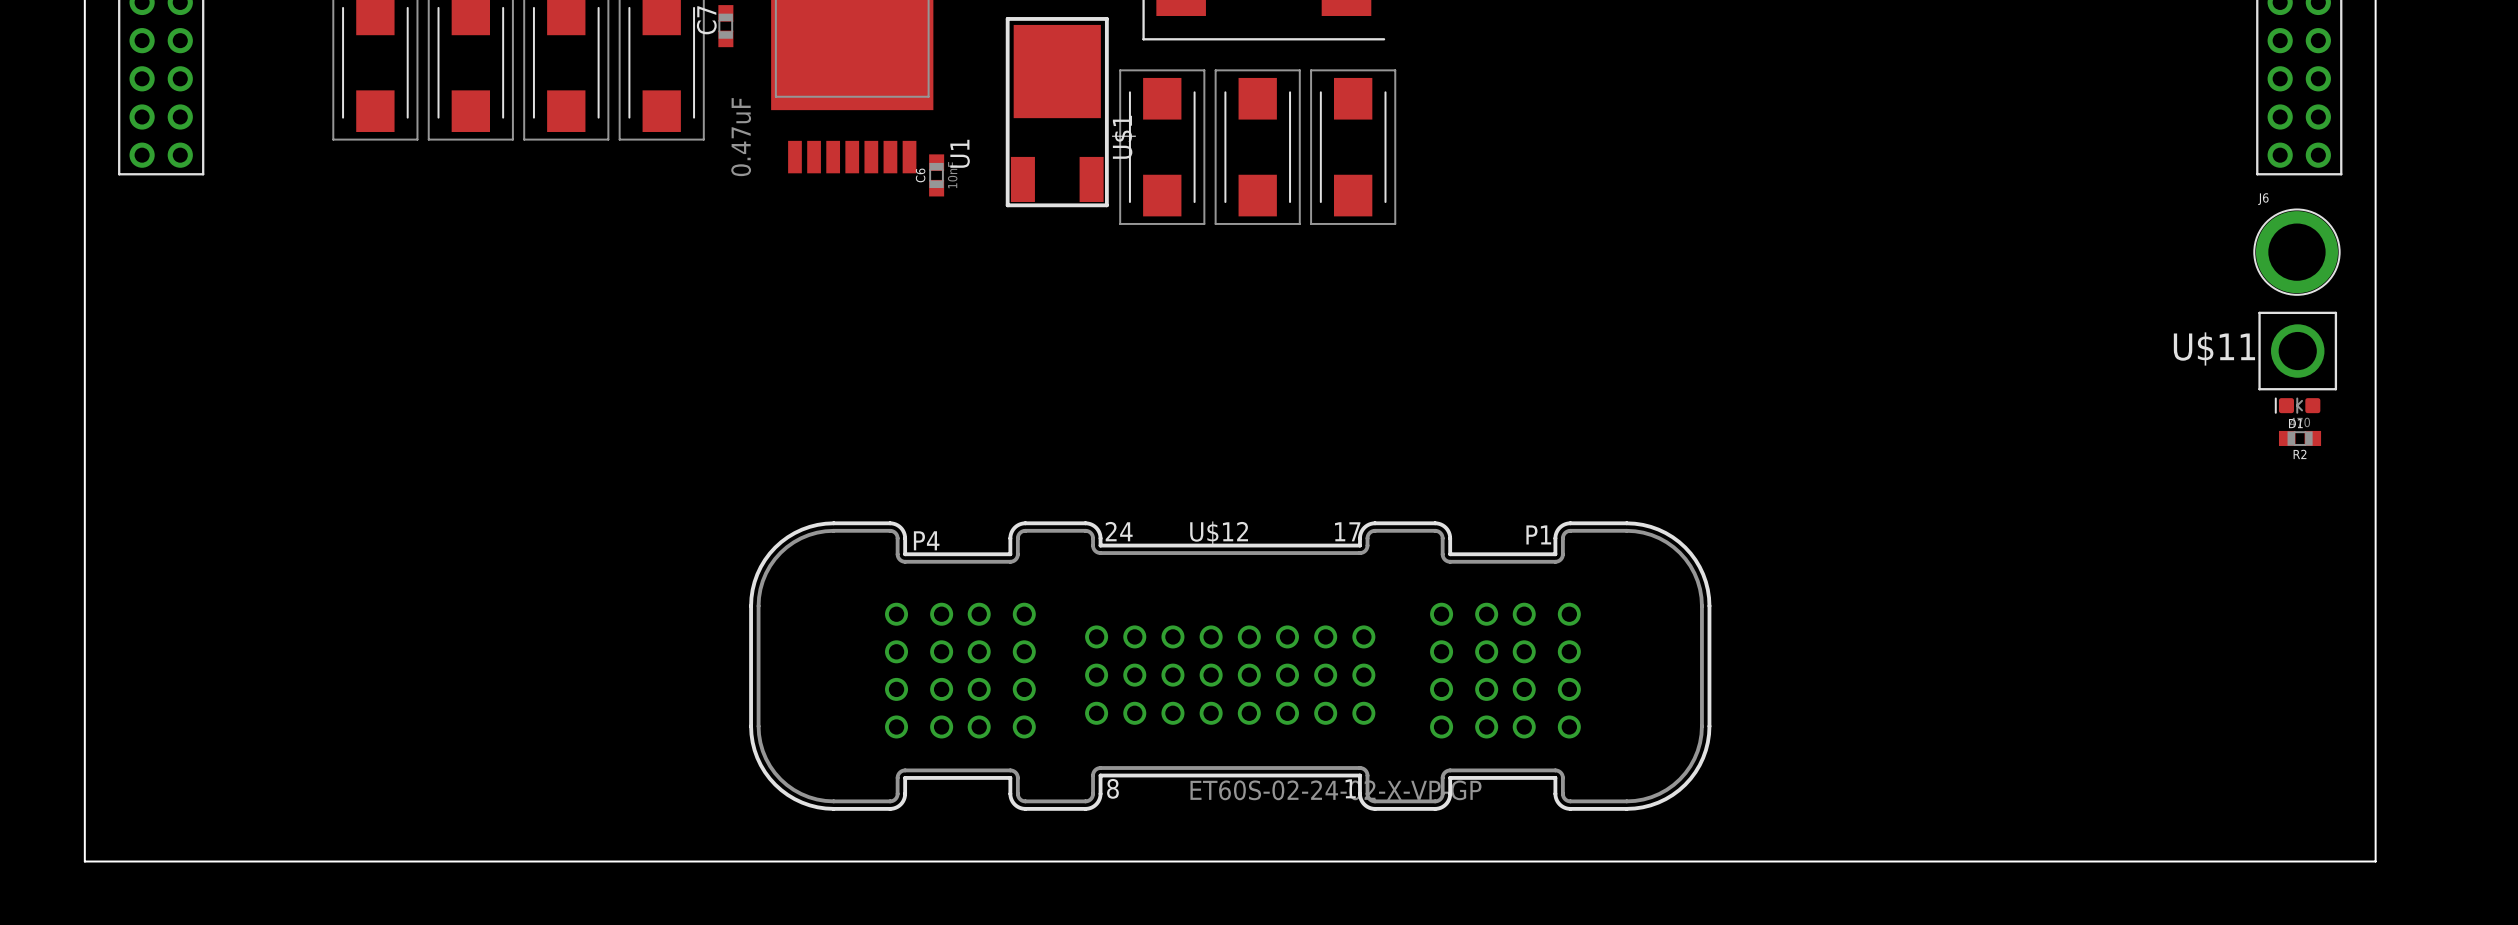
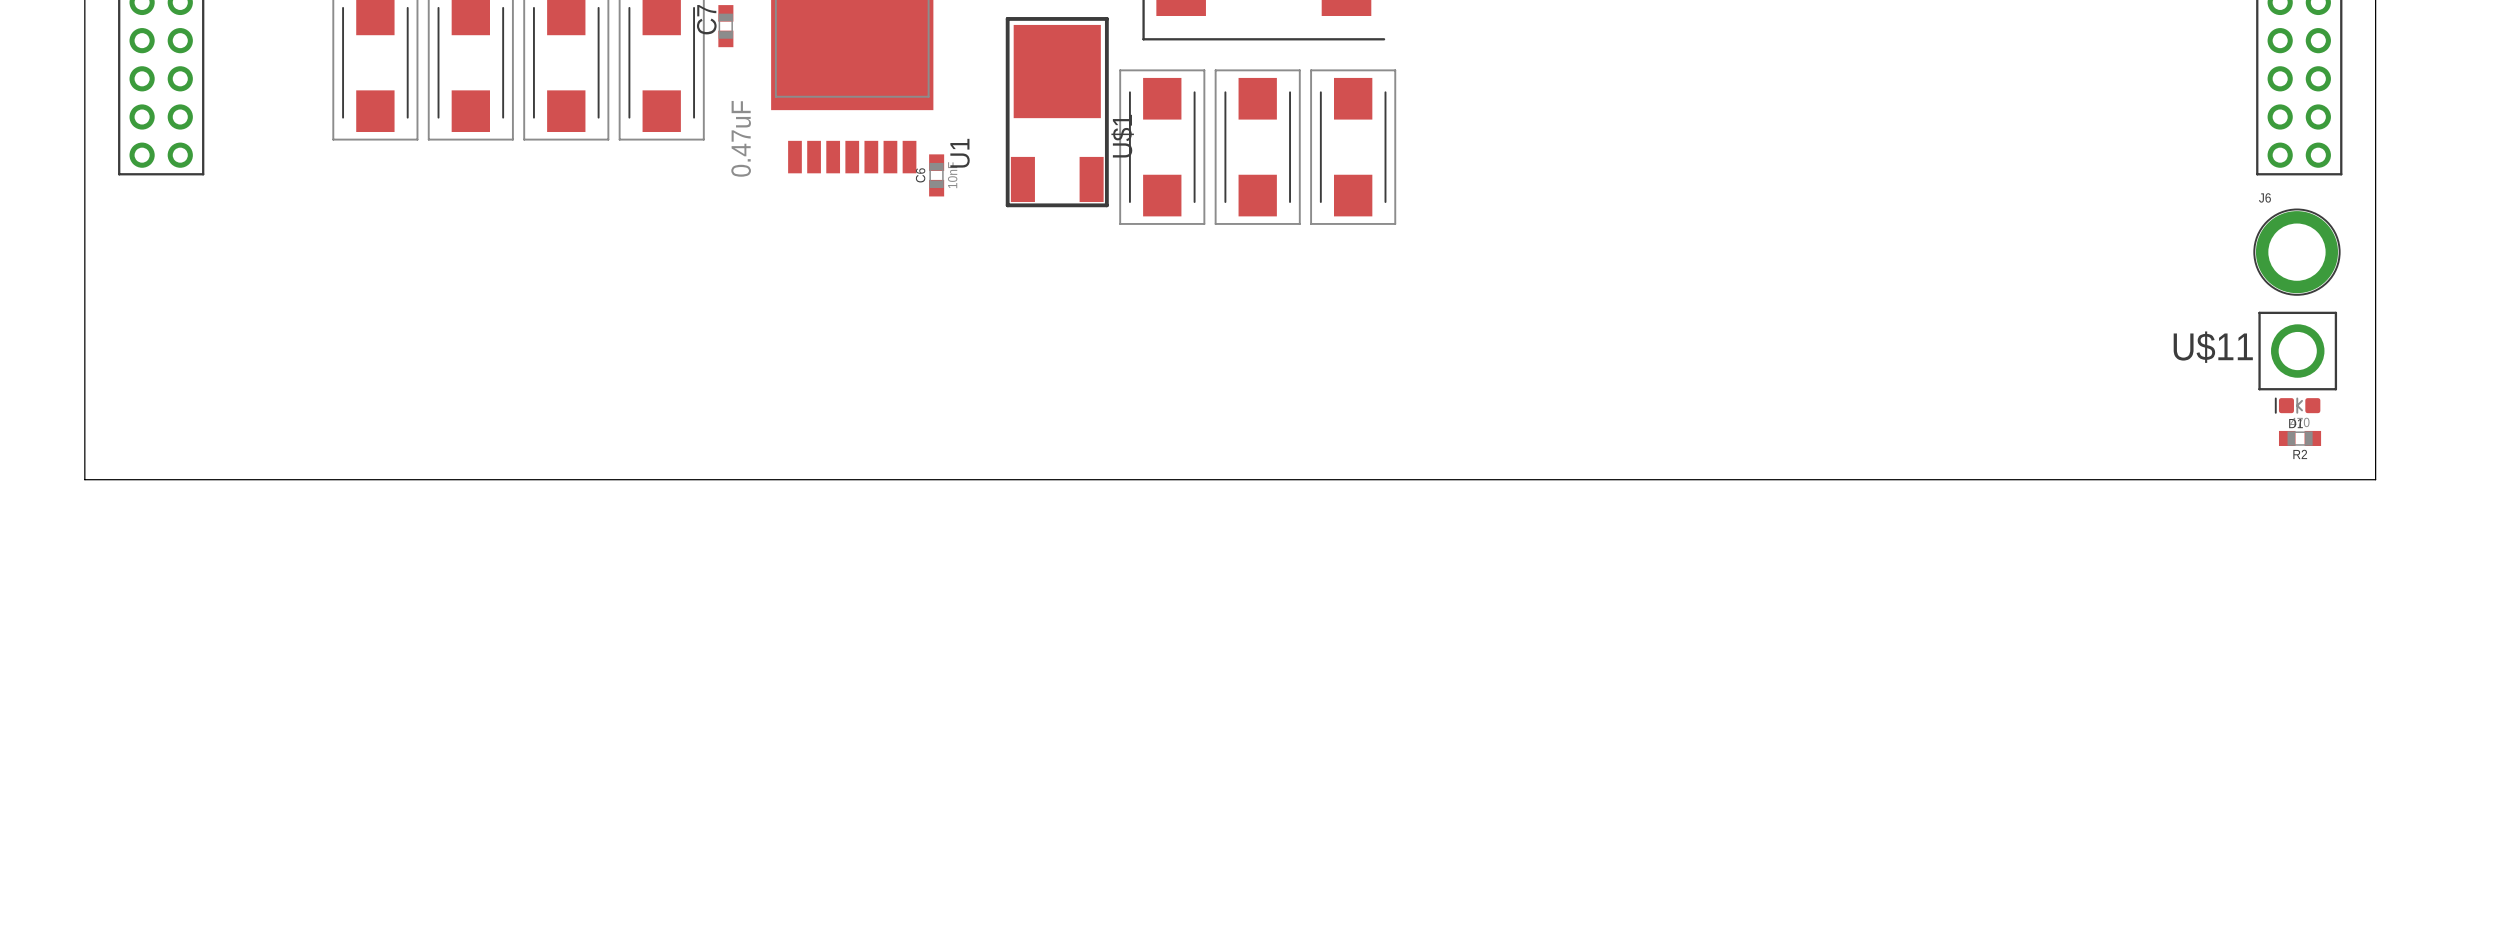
board edge: (84, 479) (84, 861) (2375, 861) (2375, 479) -> (84, 479) (2375, 479)
U$12: ET60S-02-24-02-X-VP-GP (1230, 666) -> none

